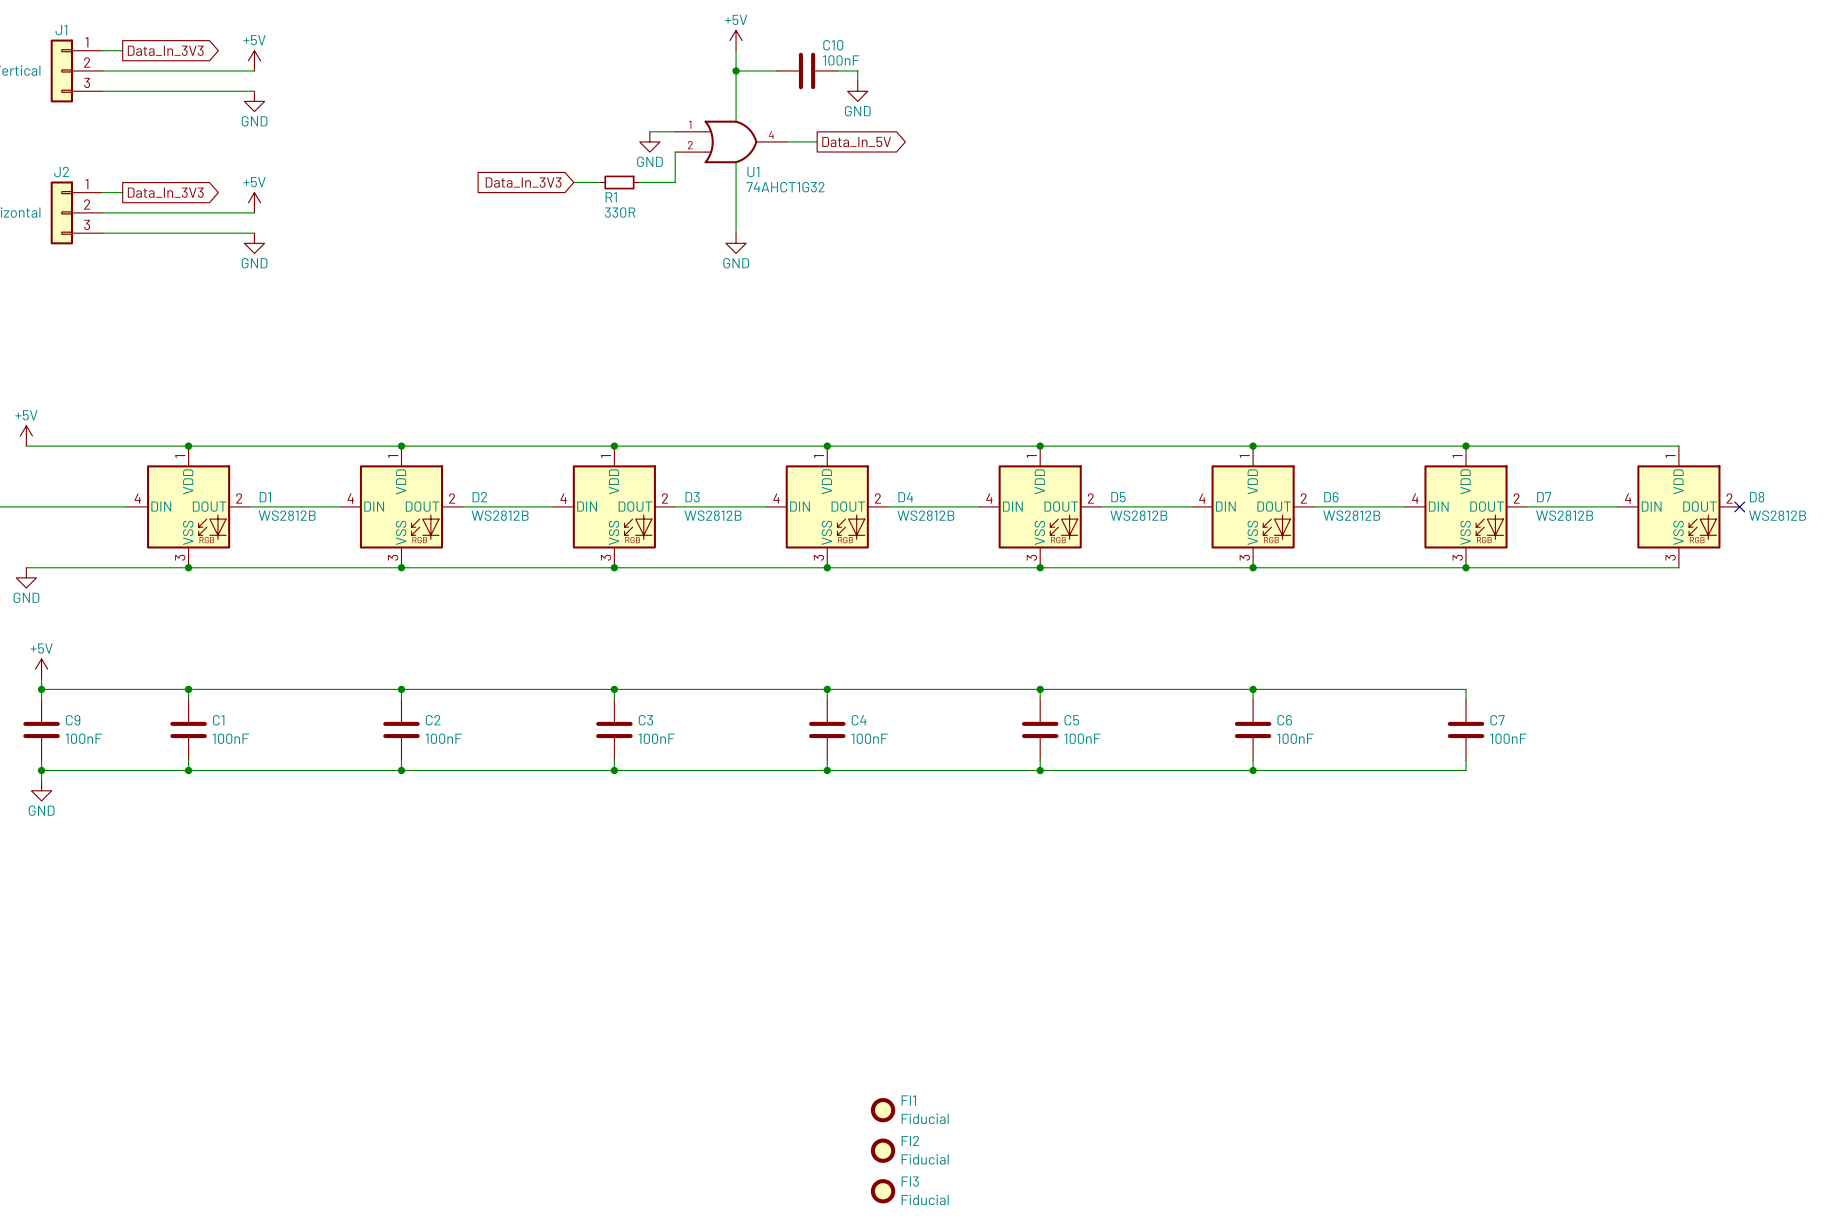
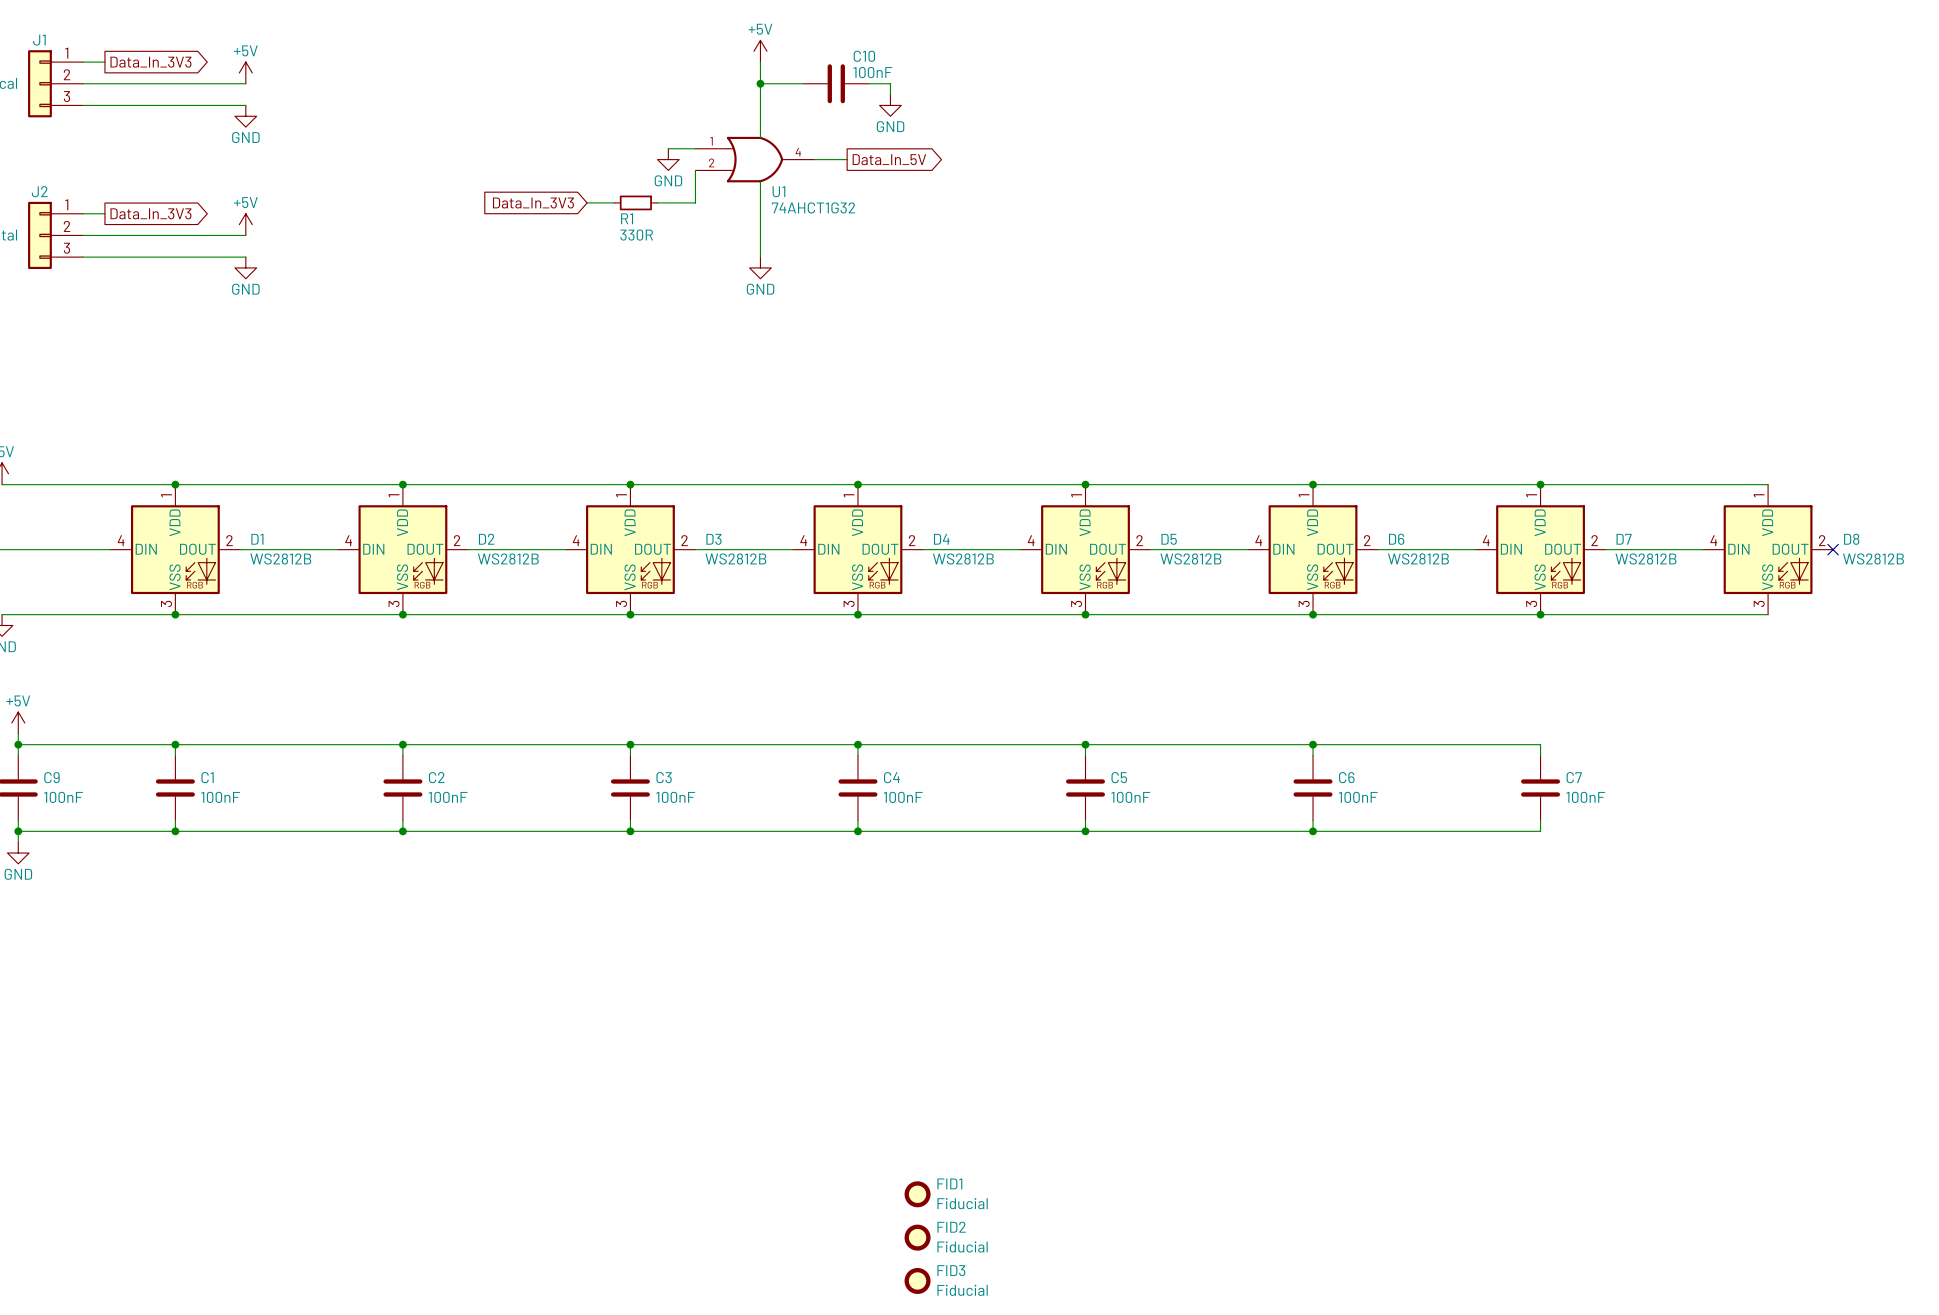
FI1 name: FI1 (908, 1100) -> FID1 (949, 1183)
FI2 name: FI2 (910, 1140) -> FID2 (951, 1227)
FI3 name: FI3 (910, 1181) -> FID3 (951, 1270)

